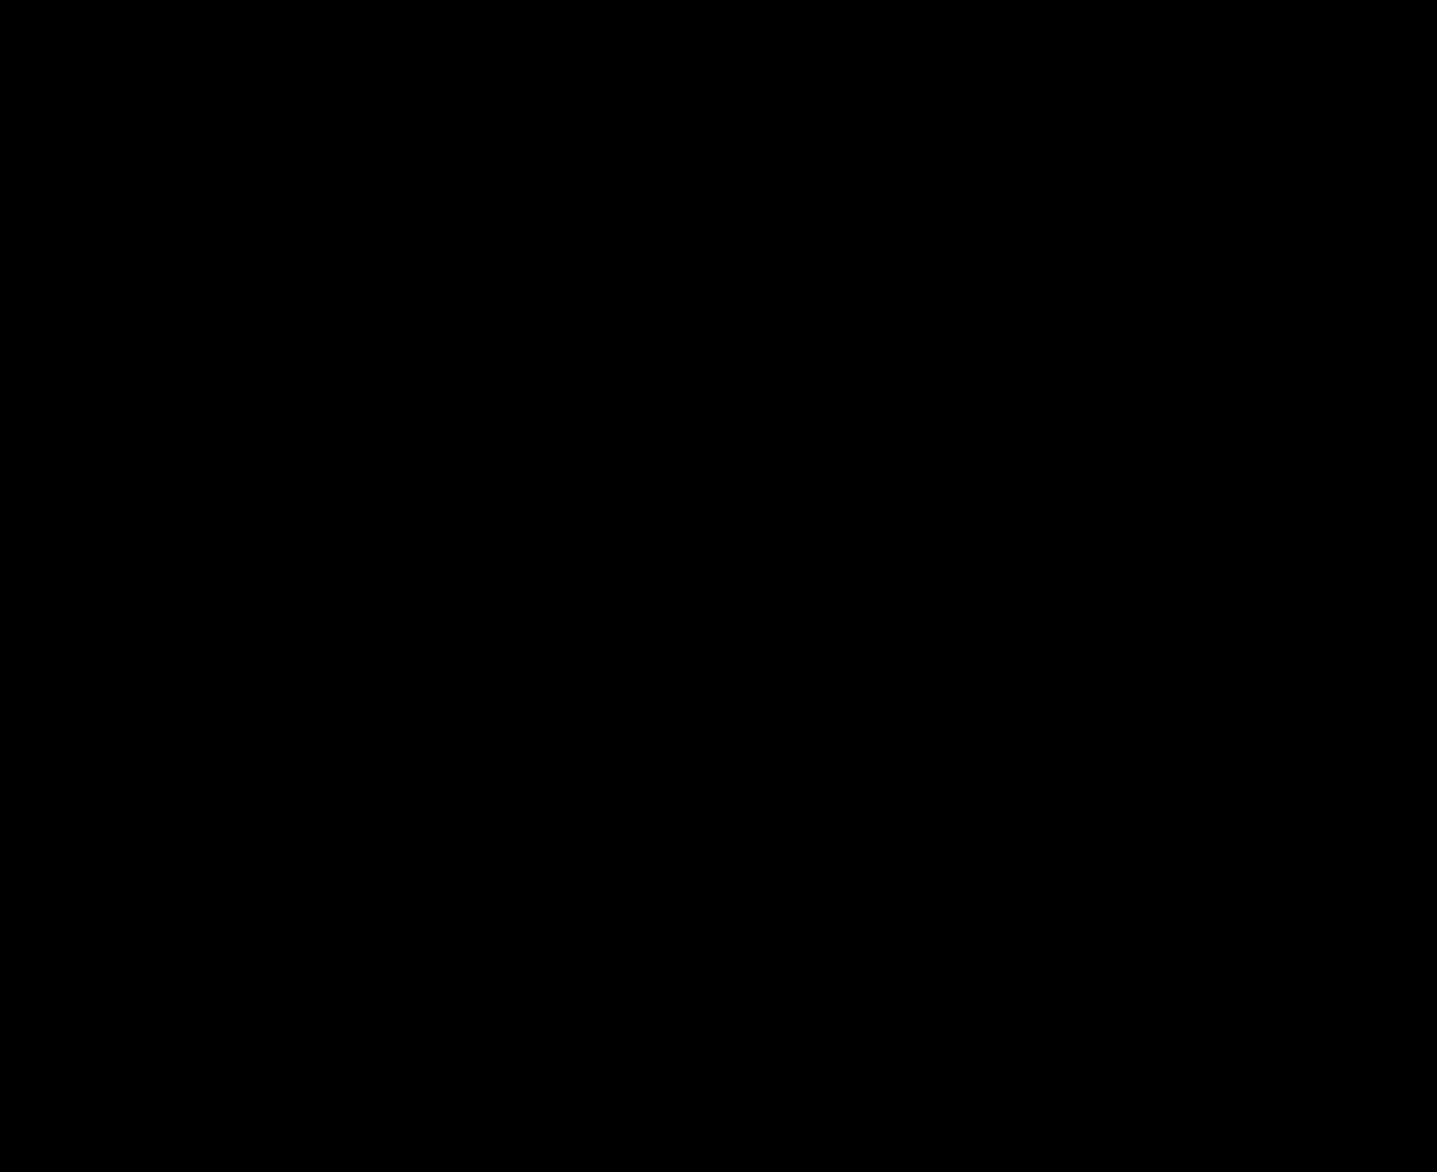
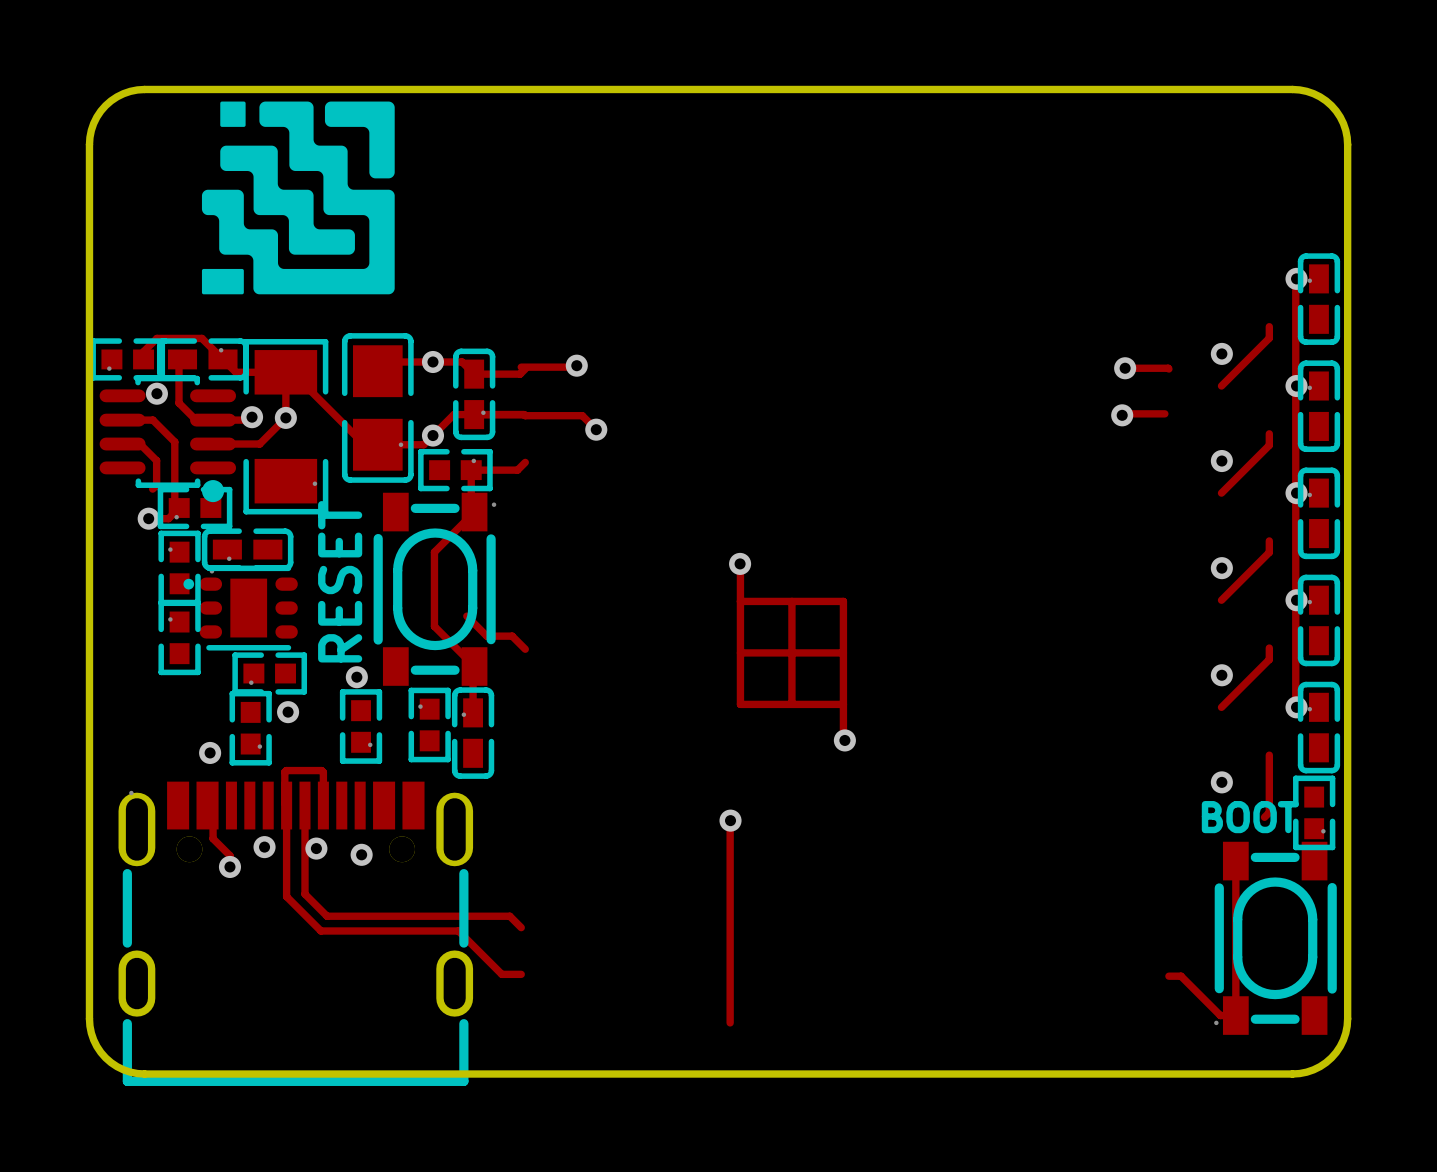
board edge: none -> (144, 89) (1292, 89) (1313, 93) (1326, 100) (1336, 111) (1343, 123) (1347, 144) (1347, 1018) (1343, 1039) (1336, 1052) (1326, 1062) (1313, 1069) (1292, 1074) (144, 1074) (130, 1072) (111, 1062) (100, 1052) (93, 1039) (89, 1018) (89, 144) (93, 123) (105, 105) (123, 93) (144, 89)
drawing: none -> [201, 101, 395, 295]
track: none -> (1296, 278) (1296, 707)
via: none -> (1296, 278)
part: none -> (1318, 299)
track: none -> (1269, 326) (1269, 338) (1221, 386)
via: none -> (1221, 353)
part: none -> (127, 359)
track: none -> (143, 359) (143, 351) (156, 338) (201, 338) (235, 372) (292, 372) (362, 442) (373, 442)
track: none -> (182, 359) (178, 362) (178, 403) (196, 420) (249, 420) (252, 417)
part: none -> (202, 359)
via: none -> (432, 362)
track: none -> (576, 365) (521, 367)
via: none -> (576, 365)
track: none -> (525, 368) (520, 374) (474, 374) (462, 362) (387, 362) (377, 371)
track: none -> (1125, 368) (1168, 368)
via: none -> (1125, 368)
track: none -> (285, 372) (285, 417) (259, 444) (213, 444)
via: none -> (1296, 386)
via: none -> (156, 393)
part: none -> (474, 394)
part: none -> (1318, 406)
part: none -> (377, 407)
track: none -> (1164, 413) (1122, 415)
via: none -> (1122, 415)
via: none -> (252, 417)
via: none -> (285, 417)
track: none -> (122, 420) (152, 420) (174, 441) (174, 503) (179, 508) (168, 518) (148, 518)
part: none -> (285, 426)
track: none -> (596, 429) (582, 415) (453, 414) (423, 444) (377, 444)
via: none -> (596, 429)
track: none -> (1269, 433) (1269, 445) (1221, 493)
via: none -> (432, 435)
part: none -> (167, 438)
track: none -> (122, 444) (139, 444) (156, 460) (156, 485) (152, 489)
via: none -> (1221, 461)
track: none -> (525, 462) (517, 470) (471, 470) (471, 508) (474, 512) (434, 552) (434, 626) (474, 666) (473, 712)
part: none -> (455, 470)
via: none -> (1296, 493)
part: none -> (195, 508)
part: none -> (1318, 513)
via: none -> (148, 518)
track: none -> (1269, 540) (1269, 552) (1221, 600)
part: none -> (247, 549)
via: none -> (740, 563)
track: none -> (740, 564) (740, 704) (843, 704)
part: none -> (179, 567)
via: none -> (1221, 568)
text: none -> RESET (340, 581)
part: none -> (434, 589)
via: none -> (1296, 600)
track: none -> (740, 601) (843, 601) (844, 740)
track: none -> (791, 601) (791, 704)
part: none -> (240, 608)
track: none -> (466, 616) (486, 636) (512, 636) (525, 649)
part: none -> (1318, 620)
part: none -> (179, 637)
track: none -> (1269, 648) (1269, 659) (1221, 707)
track: none -> (740, 652) (843, 652)
part: none -> (269, 673)
via: none -> (1221, 675)
via: none -> (356, 677)
via: none -> (1296, 707)
via: none -> (288, 712)
part: none -> (429, 725)
part: none -> (361, 726)
part: none -> (1318, 727)
part: none -> (250, 728)
part: none -> (473, 733)
via: none -> (844, 740)
via: none -> (210, 752)
track: none -> (1269, 755) (1269, 812) (1264, 817)
via: none -> (1221, 782)
track: none -> (213, 805) (213, 838) (229, 855) (229, 866)
track: none -> (304, 805) (304, 894) (327, 916) (509, 916) (521, 927)
track: none -> (323, 805) (323, 772) (321, 770) (284, 772) (286, 896) (320, 930) (458, 930) (501, 974) (521, 974)
part: none -> (1314, 812)
text: none -> BOOT (1250, 817)
track: none -> (730, 820) (730, 1022)
via: none -> (730, 820)
via: none -> (264, 847)
via: none -> (316, 848)
via: none -> (361, 854)
track: none -> (1235, 861) (1235, 1015) (1220, 1015) (1181, 976) (1168, 976)
via: none -> (229, 866)
part: none -> (295, 933)
part: none -> (1275, 938)

